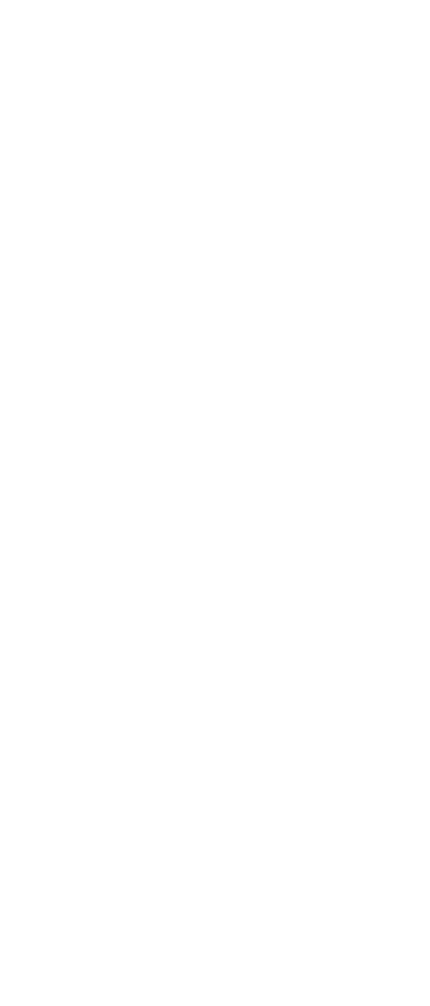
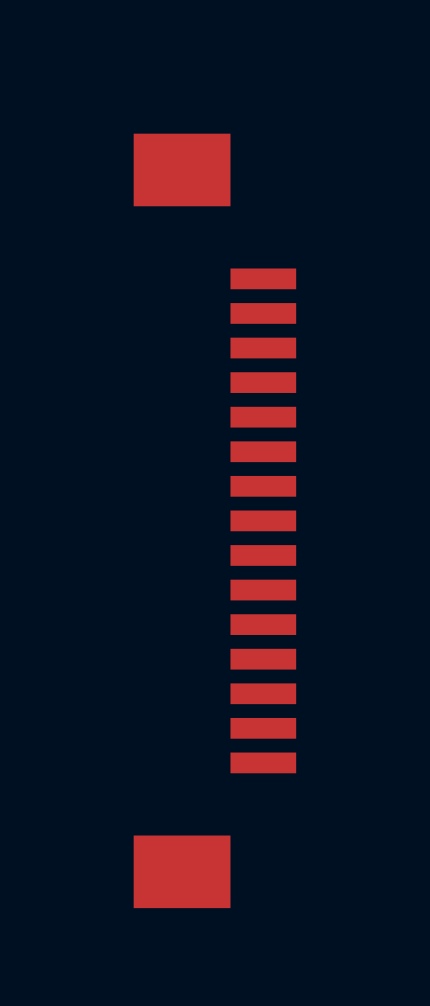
part: none -> (214, 520)

